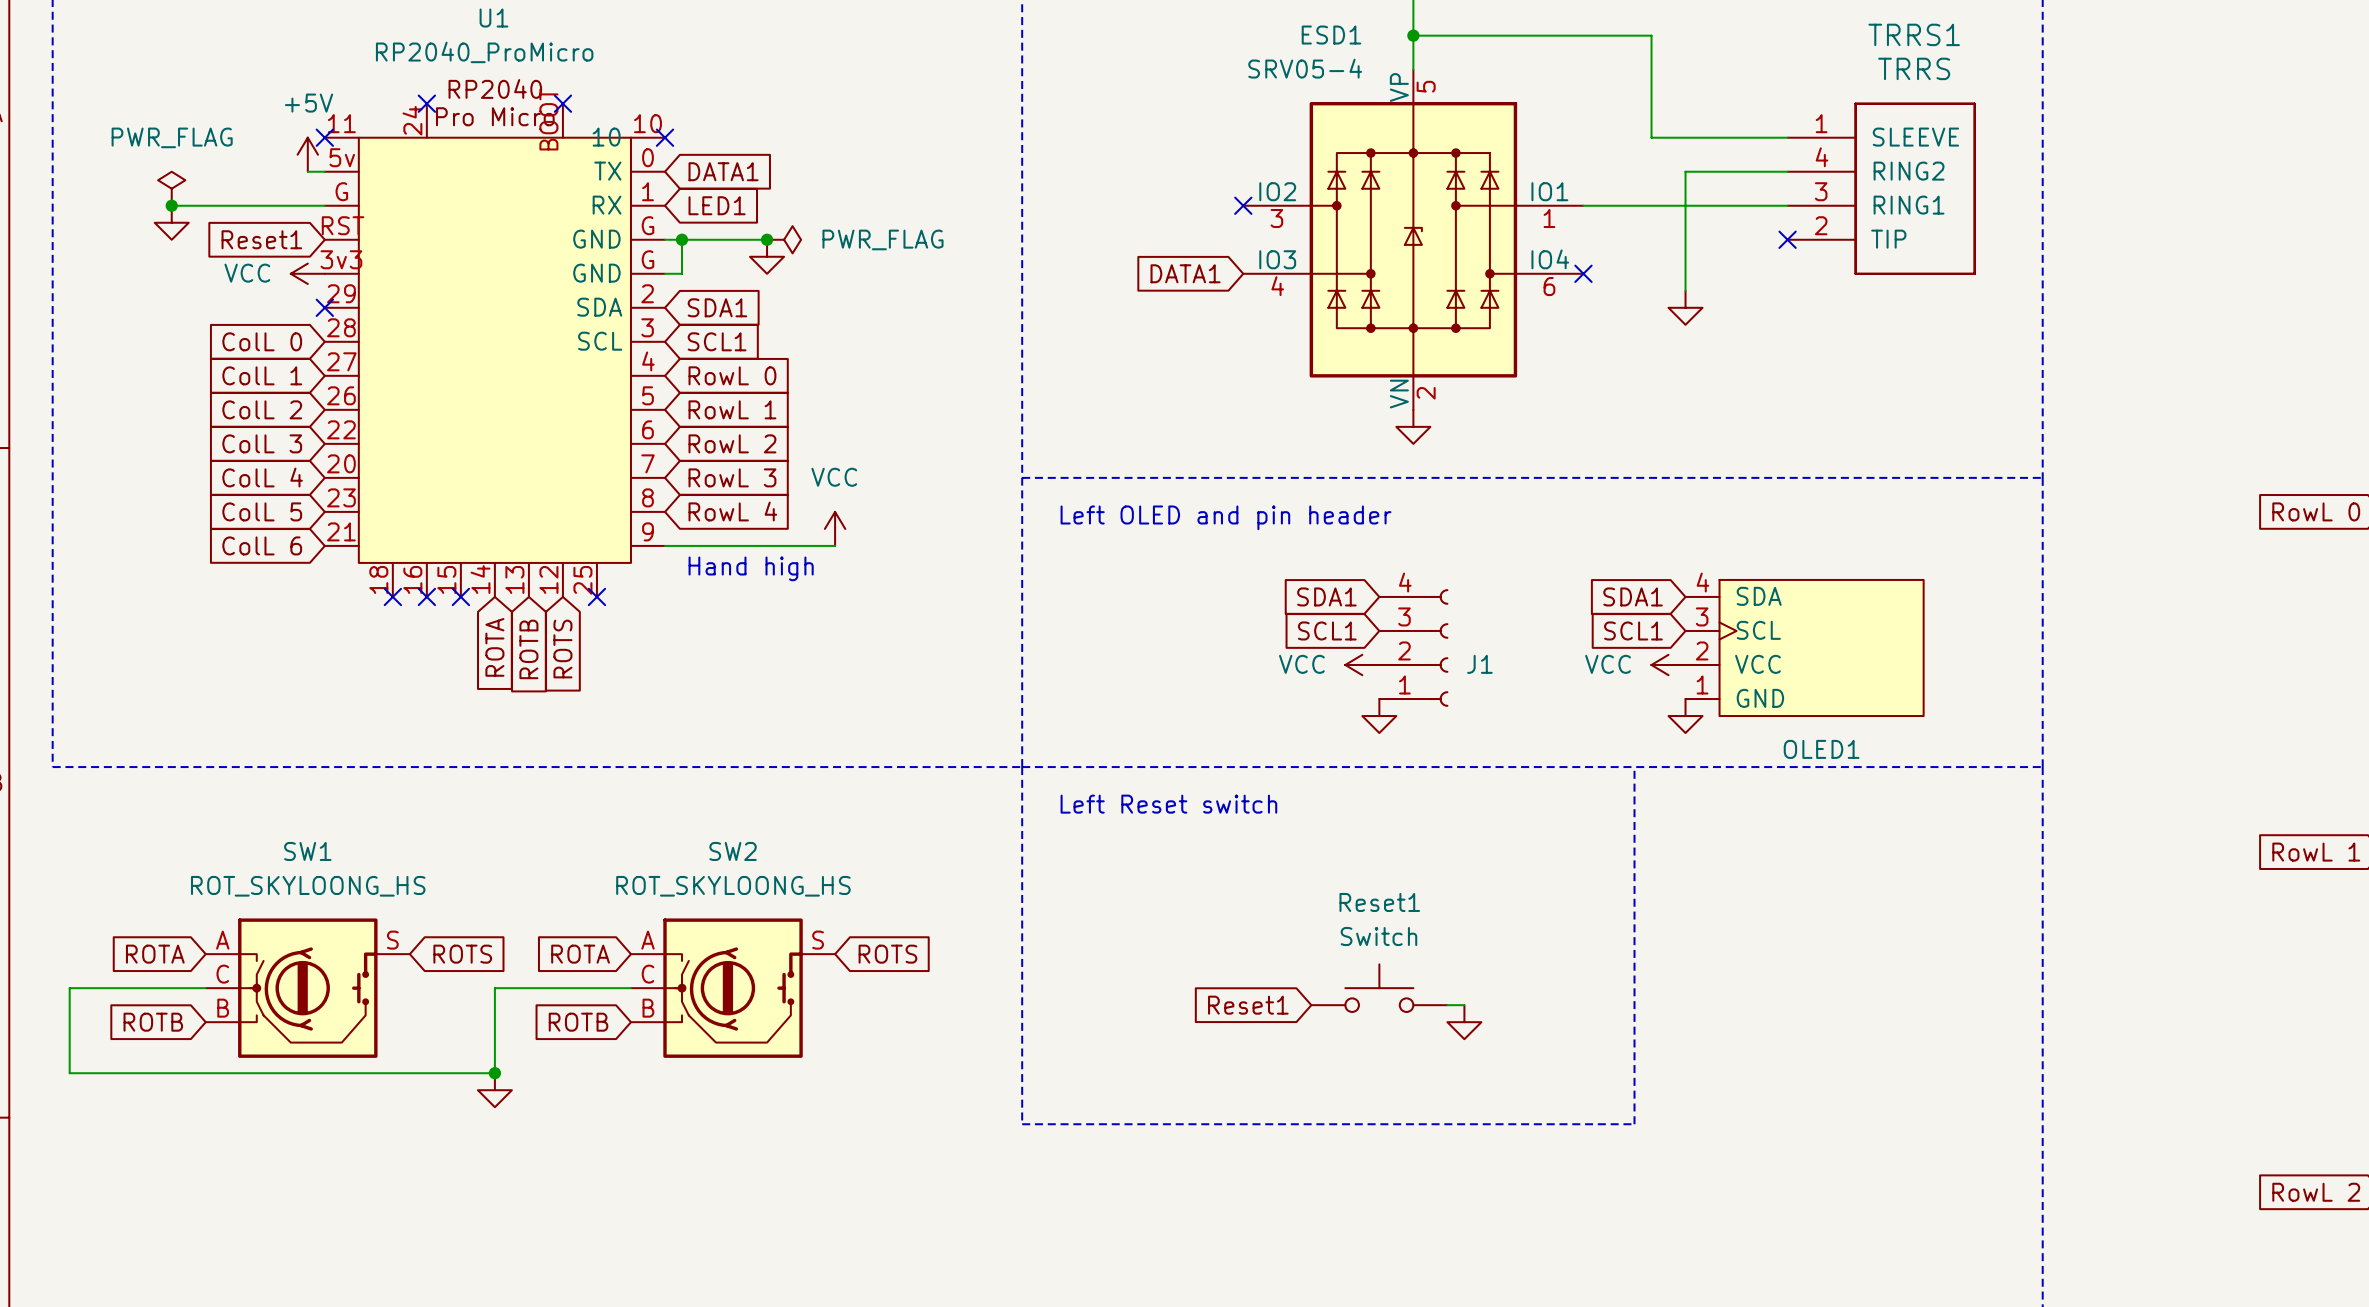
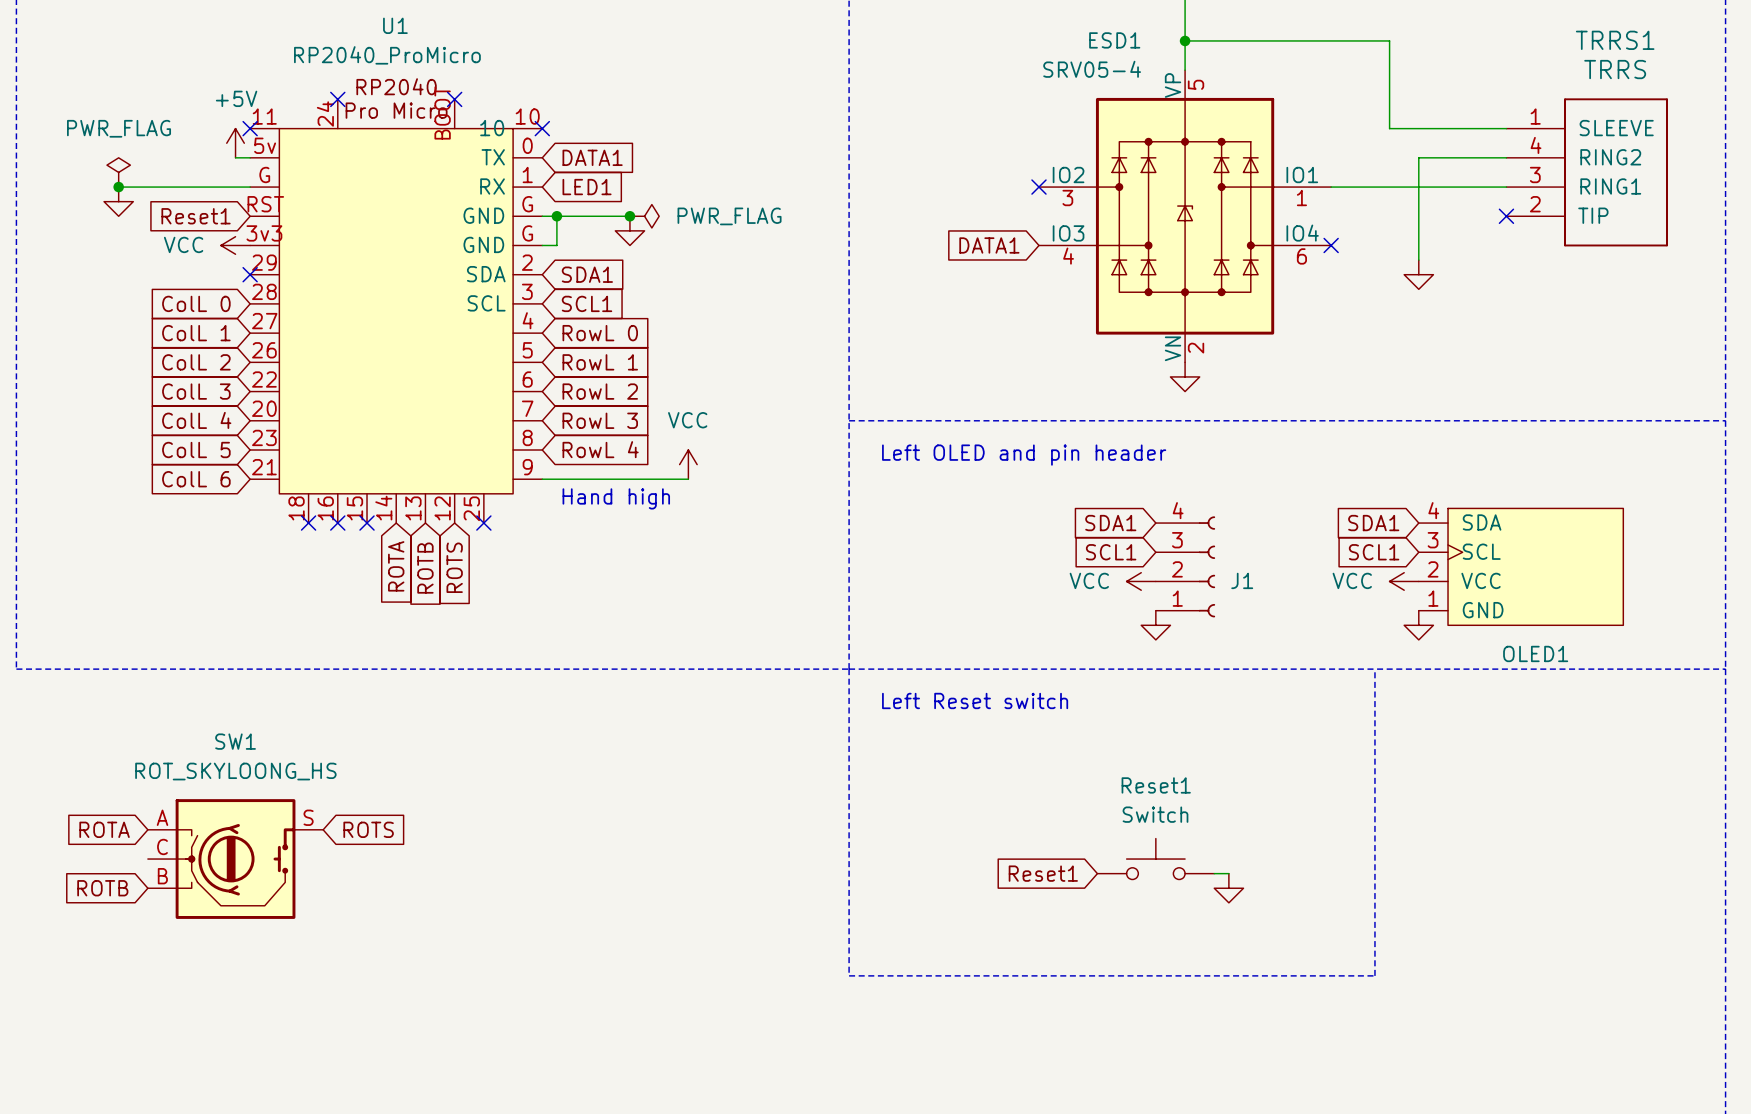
global label: ROTA (580, 954) -> none
global label: ROTS (887, 954) -> none
wire: (205, 988) (69, 988) (69, 1073) (494, 1073) (494, 988) (630, 988) -> none
SW2: ROT_SKYLOONG_HS (733, 988) -> none
global label: ROTB (578, 1022) -> none
junction: (494, 1073) -> none
power symbol: (494, 1090) -> none

